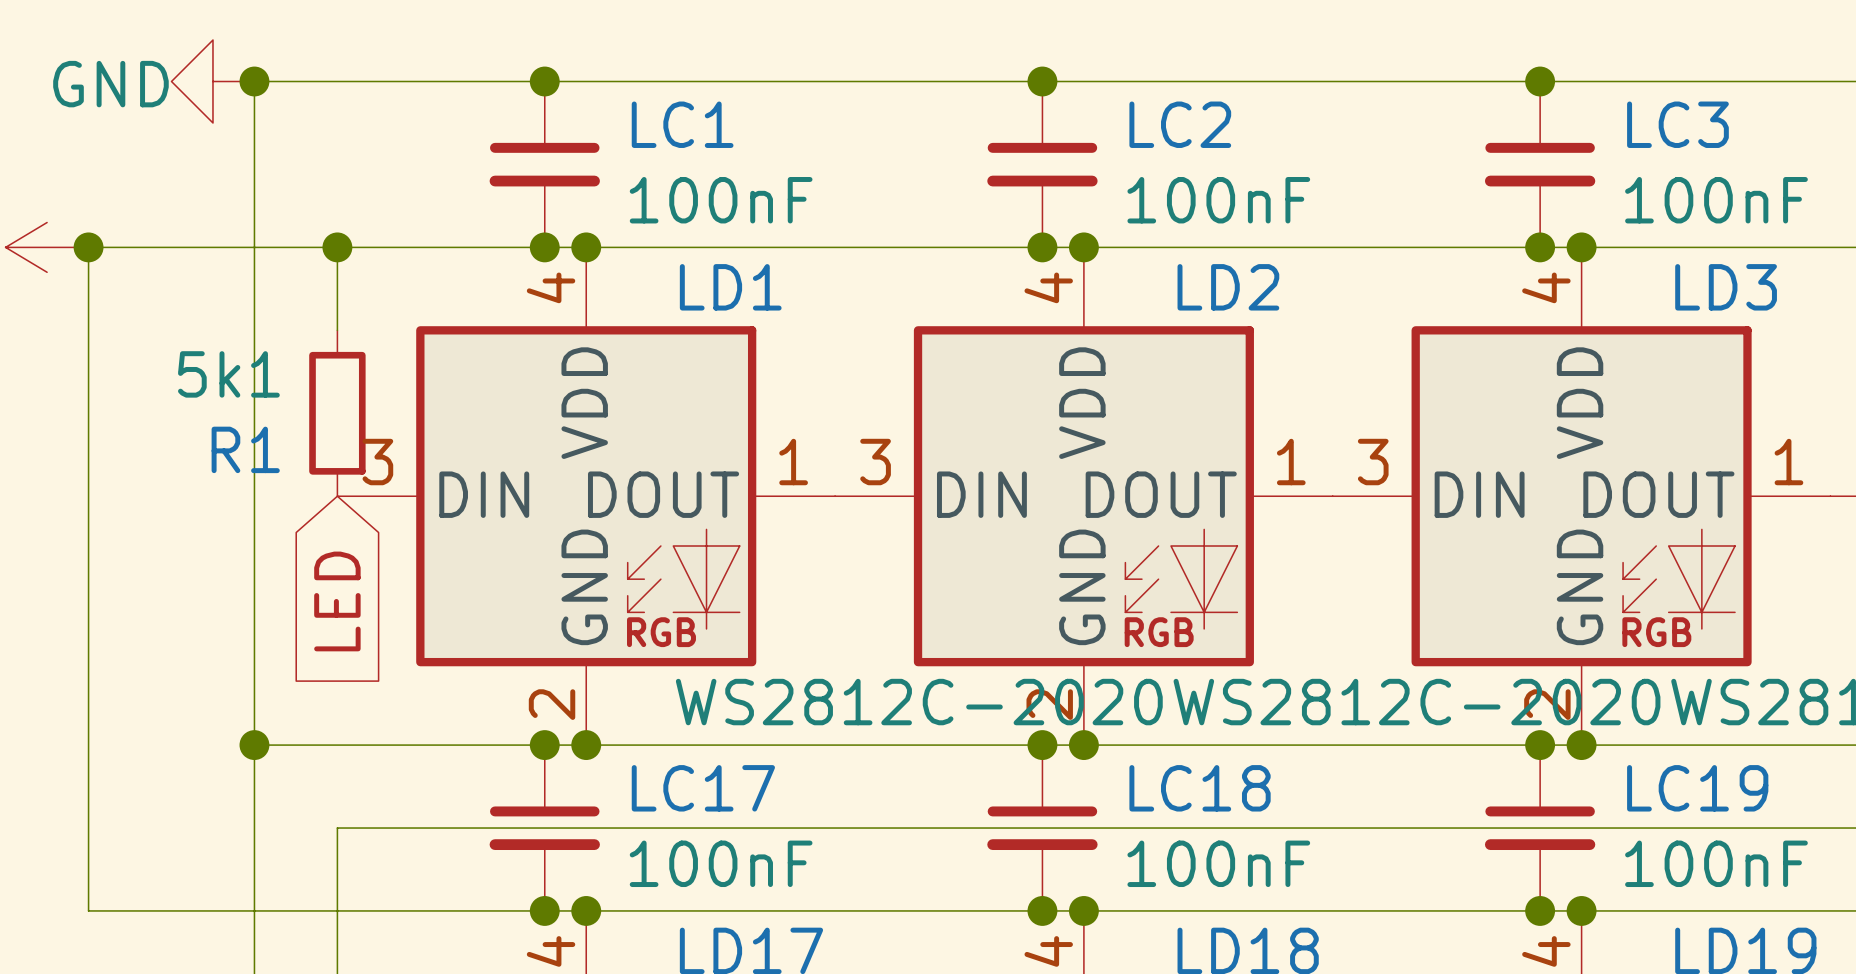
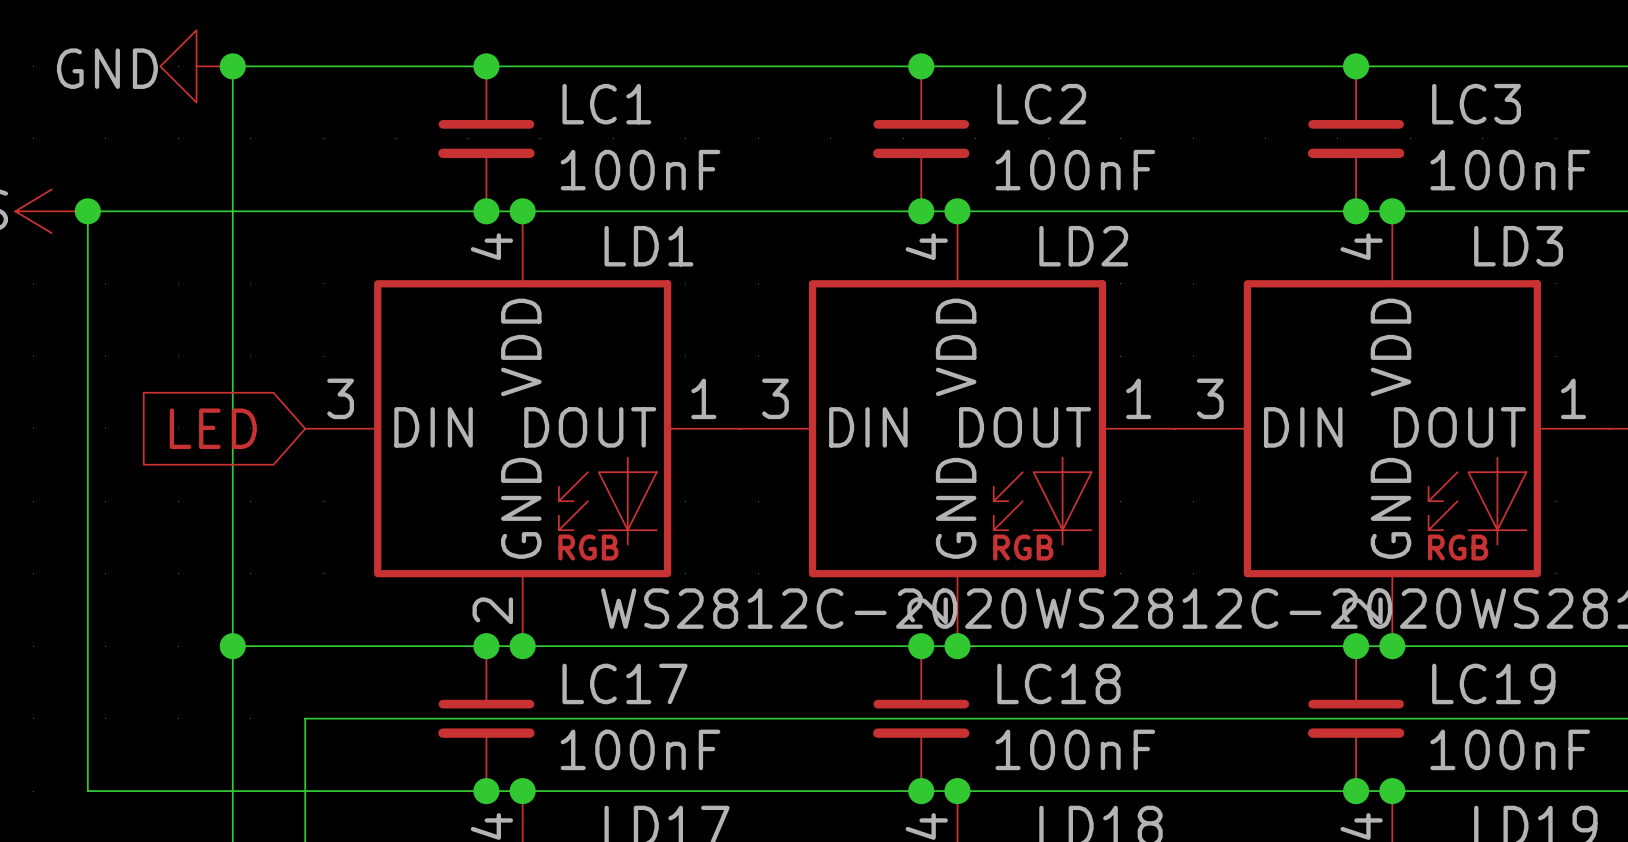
wire: (337, 247) (337, 330) -> none
junction: (337, 247) -> none
R1: 5k1 (337, 413) -> none
global label rotation: 0° (337, 601) -> 90° clockwise (213, 428)

